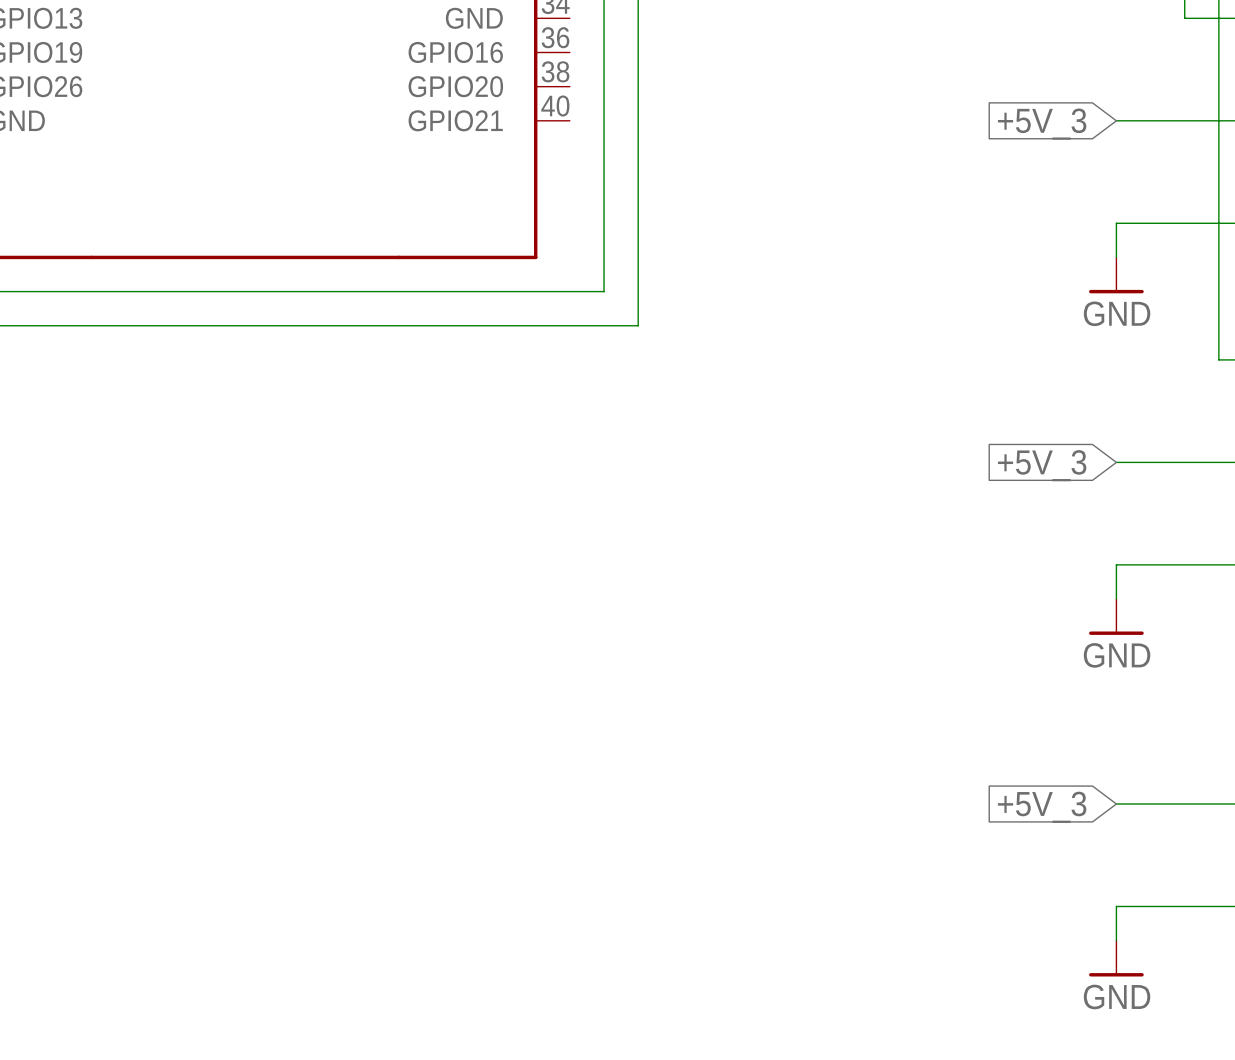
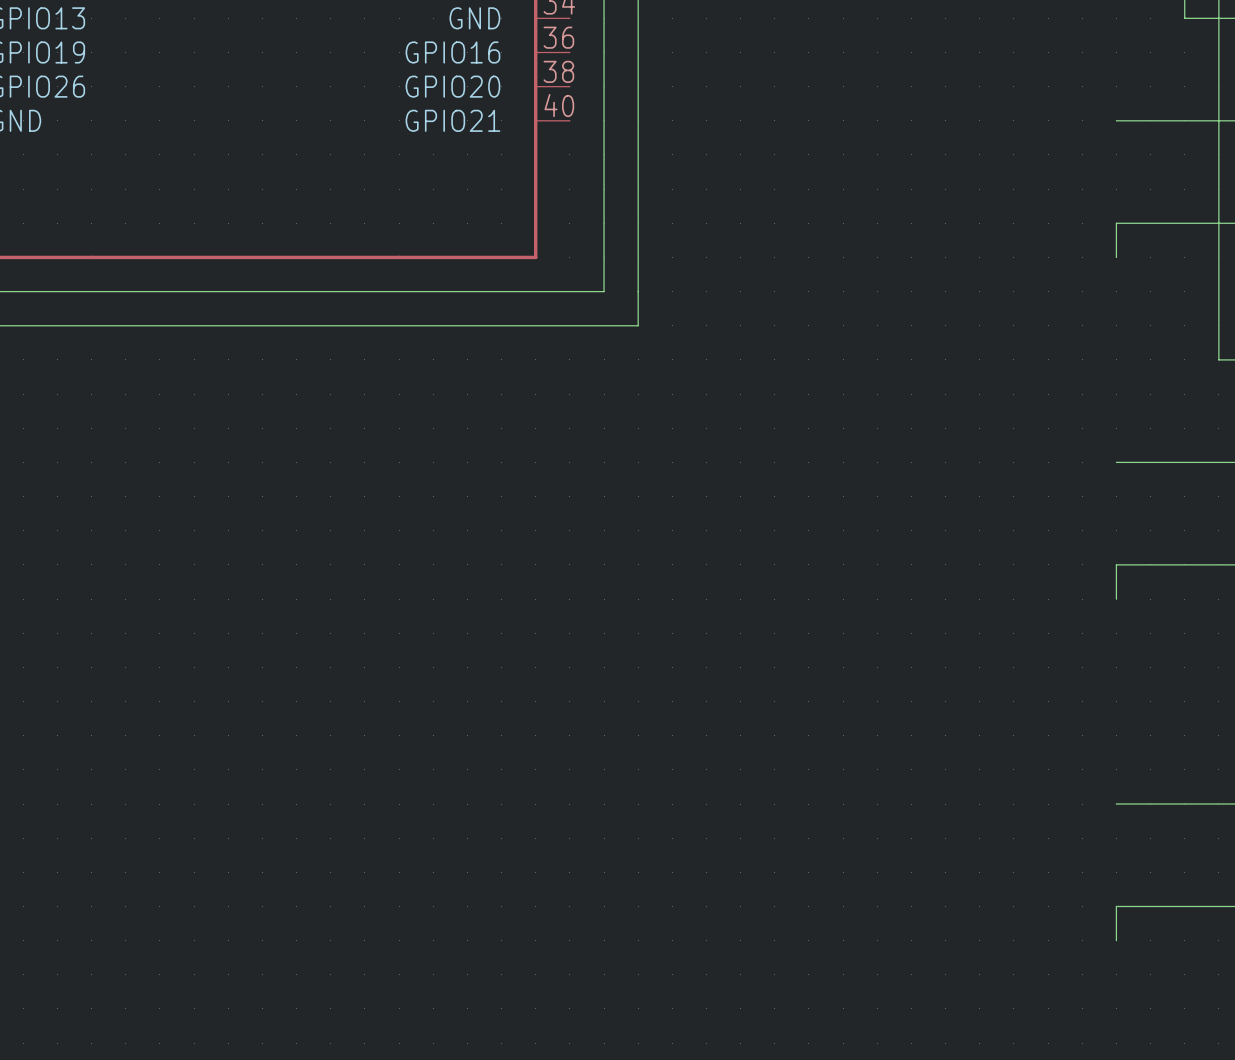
global label: +5V_3 (1042, 124) -> none
power symbol: GND (1116, 275) -> none
global label: +5V_3 (1042, 465) -> none
power symbol: GND (1116, 616) -> none
global label: +5V_3 (1042, 807) -> none
power symbol: GND (1116, 958) -> none

